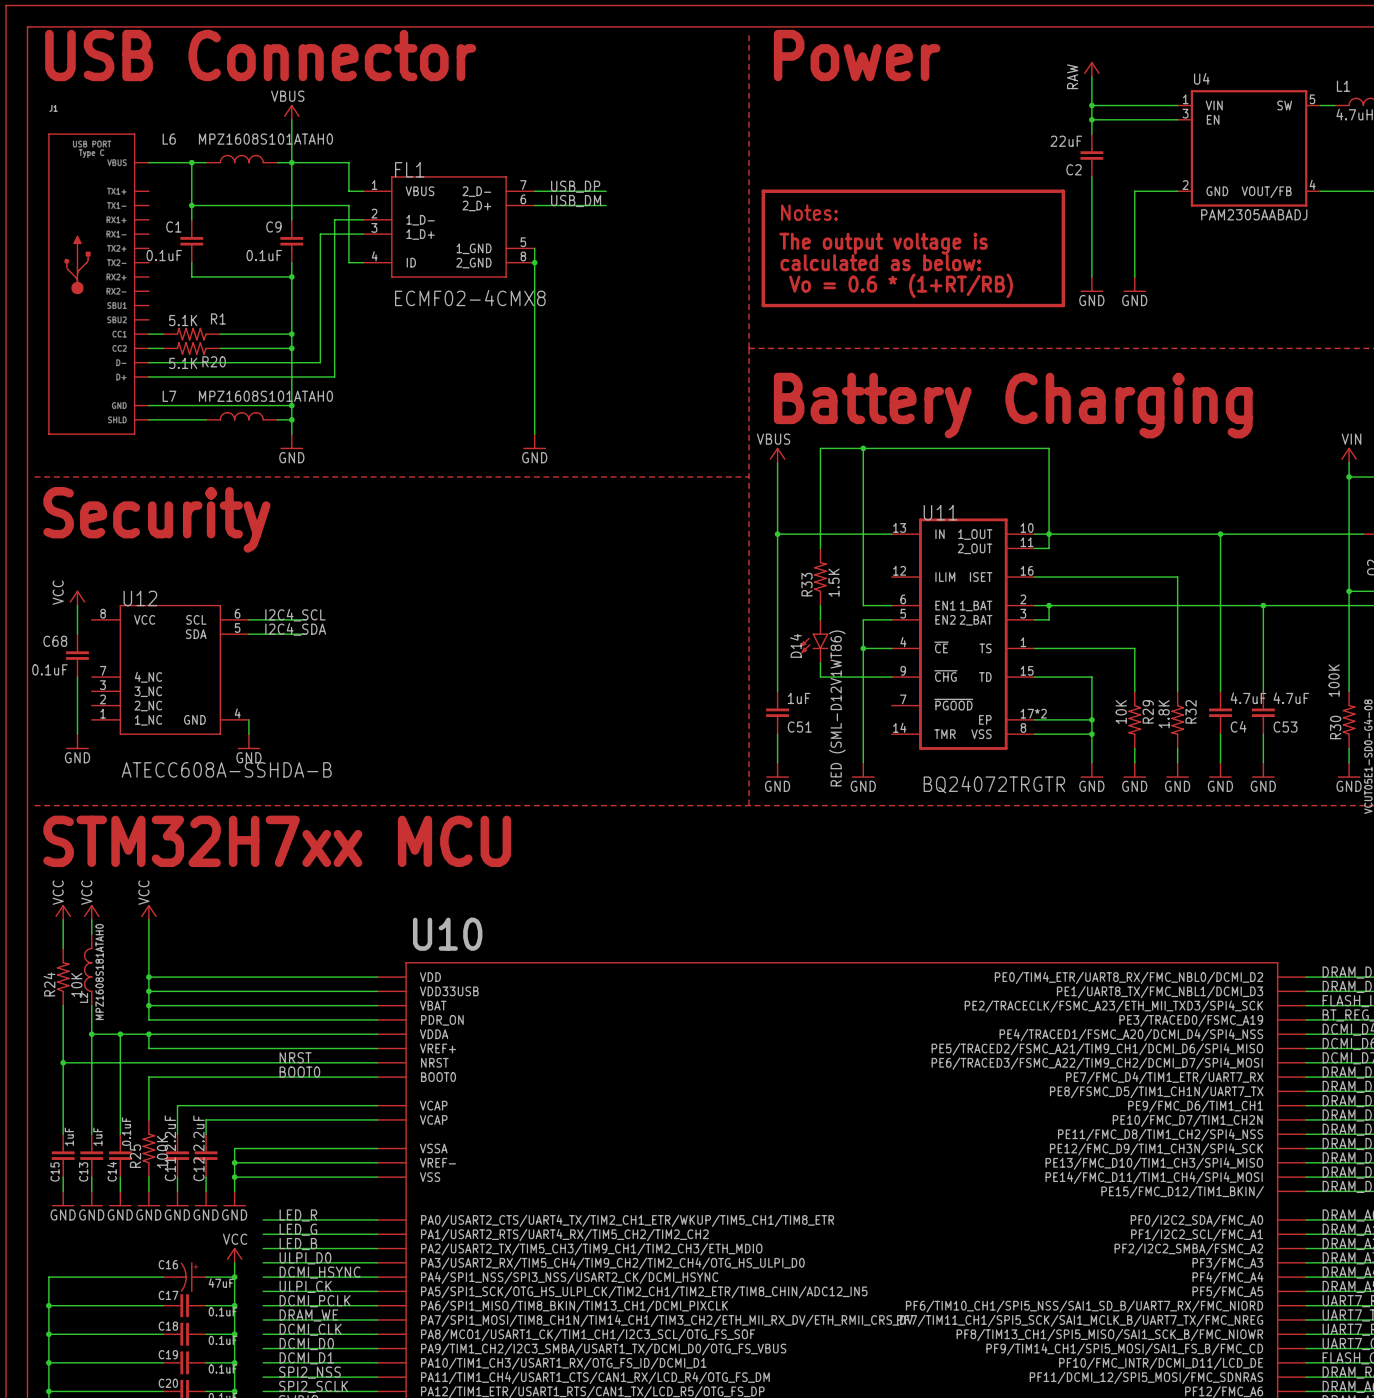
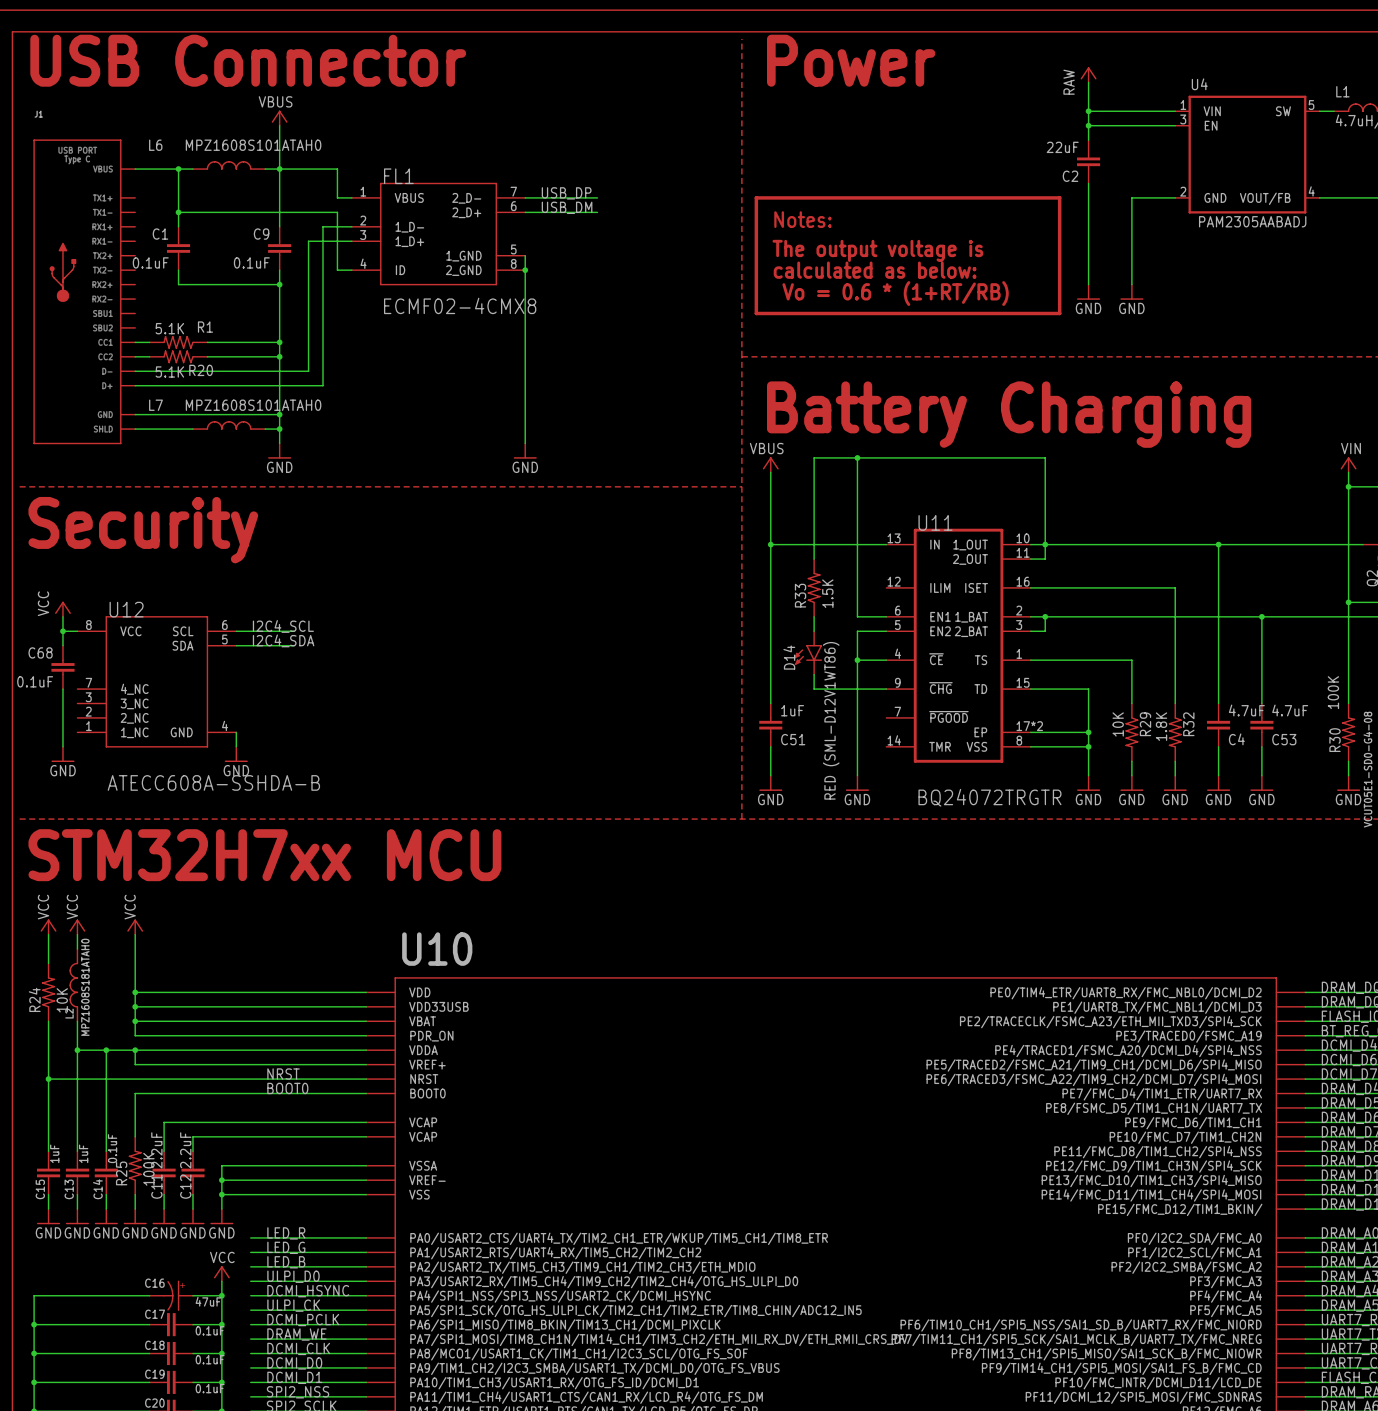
wire: none -> (62, 631) (77, 631)
junction: none -> (62, 631)

